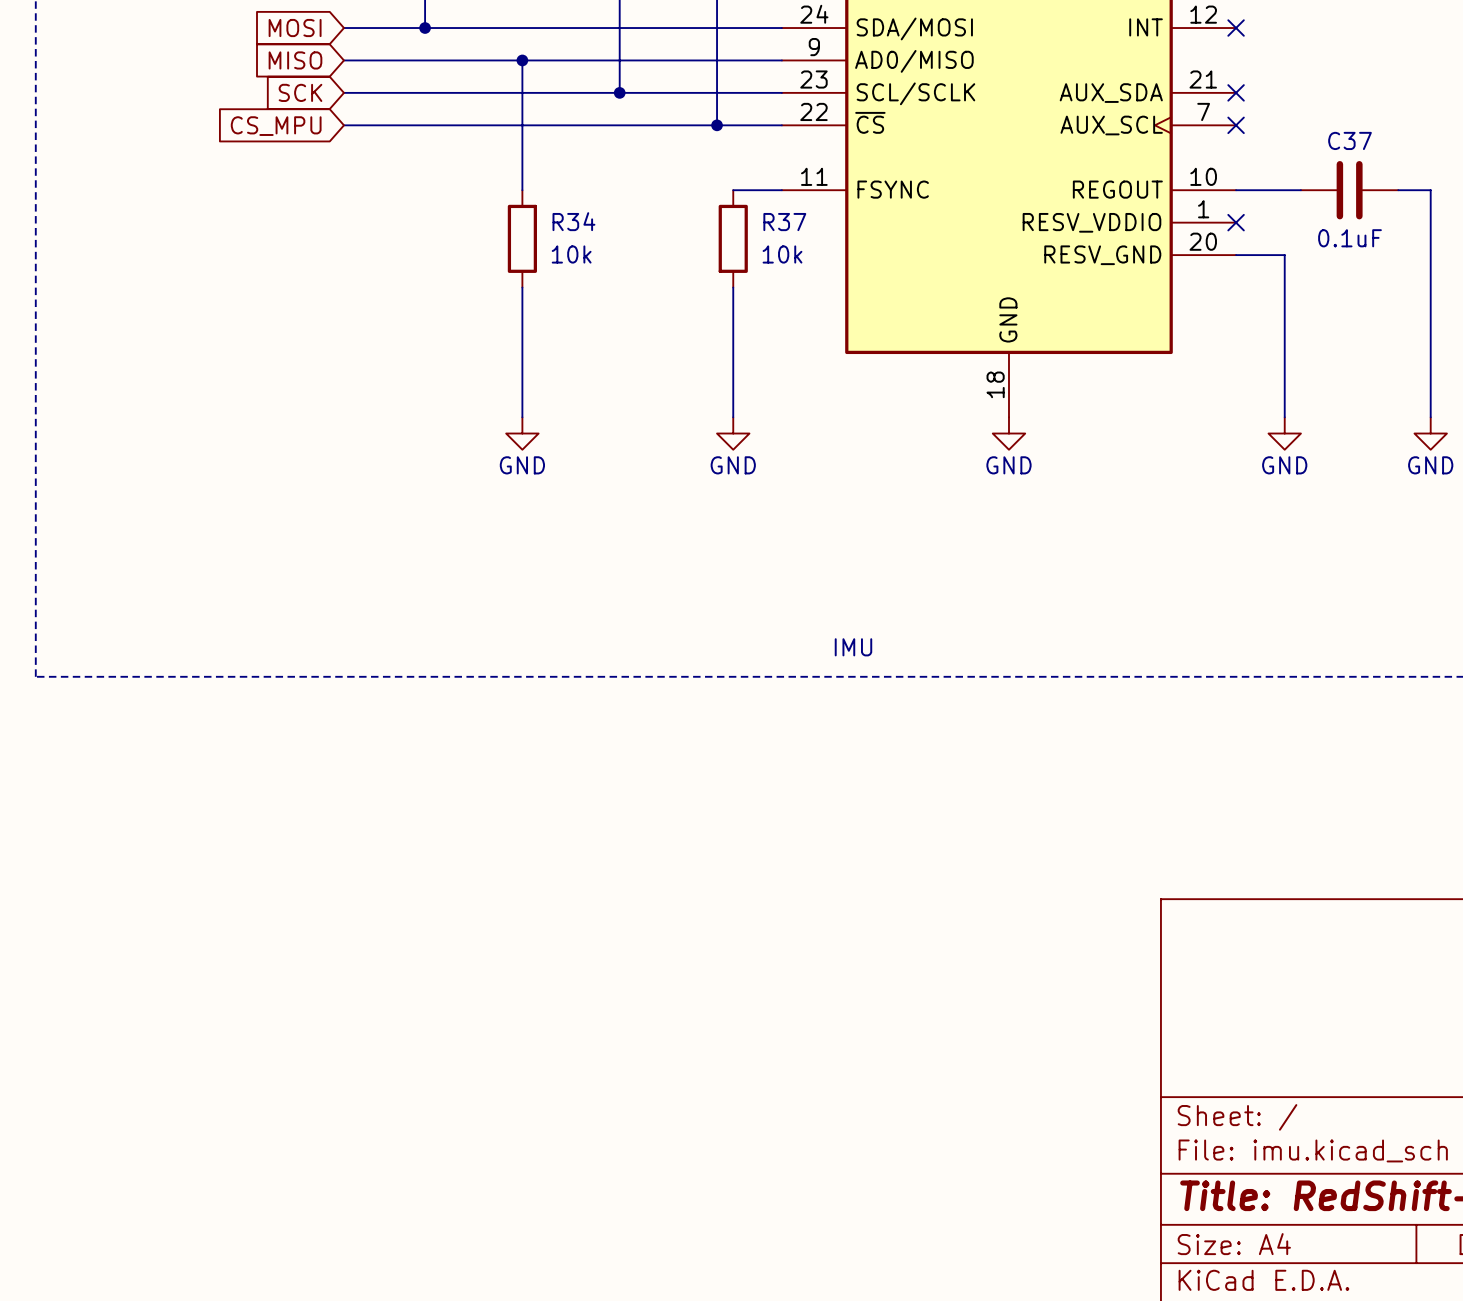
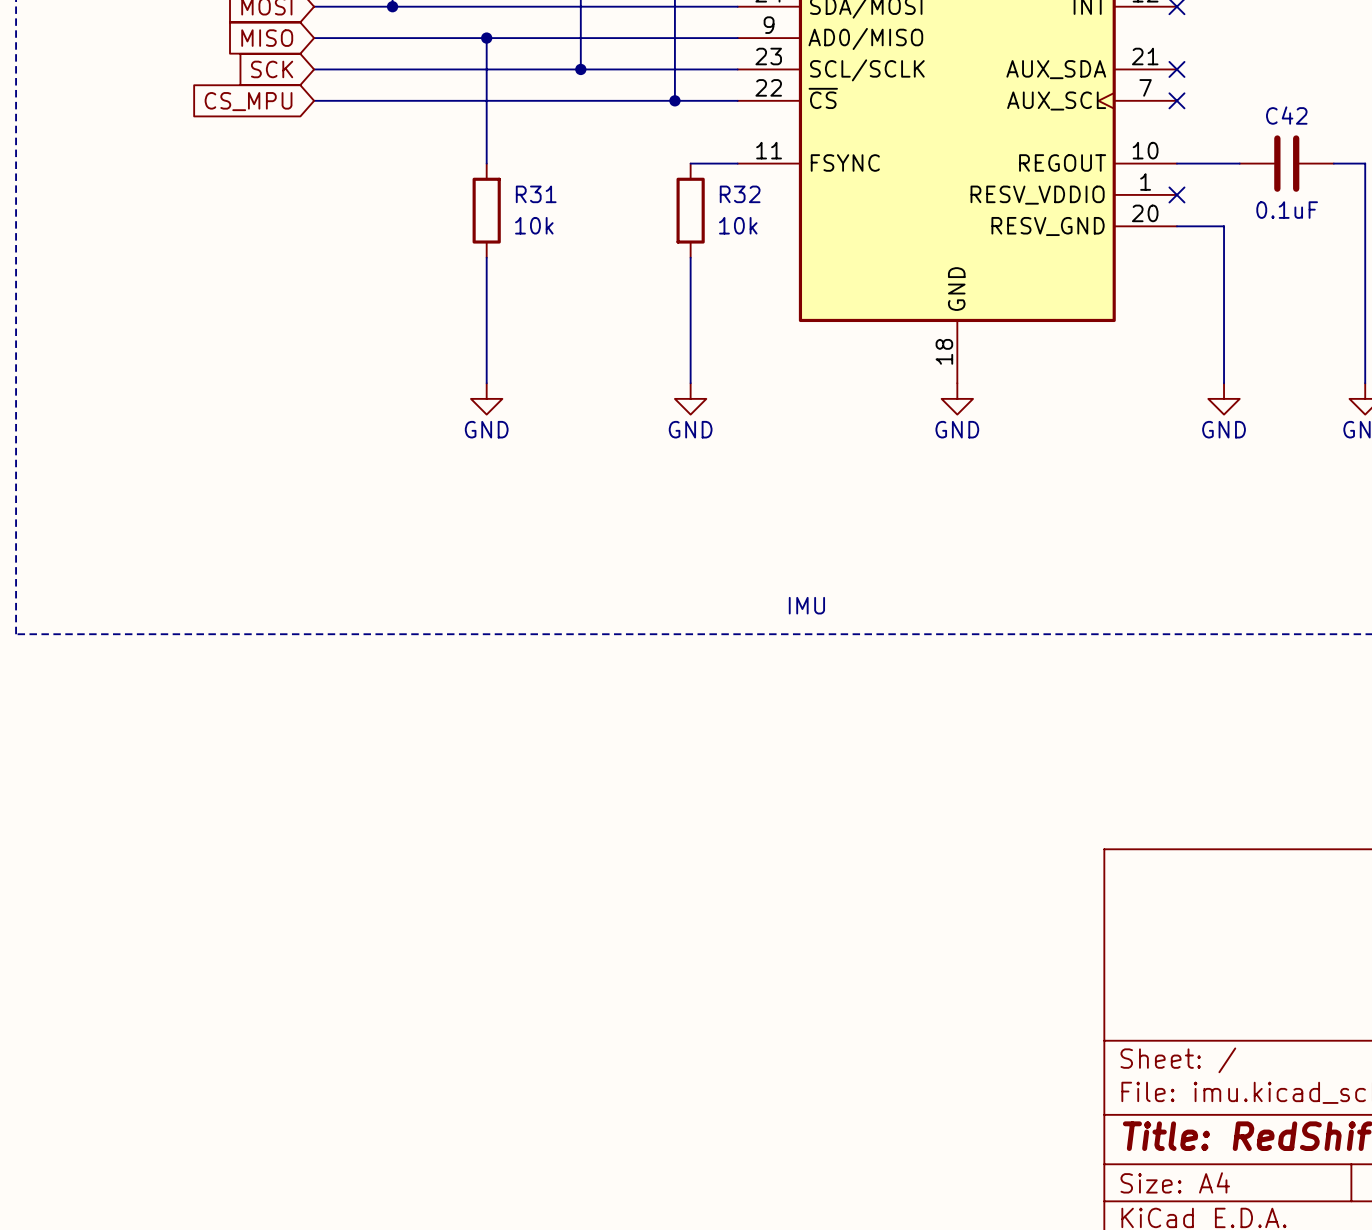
C37 name: C37 (1349, 140) -> C42 (1286, 115)
R34 name: R34 (573, 221) -> R31 (536, 194)
R37 name: R37 (784, 222) -> R32 (740, 194)

